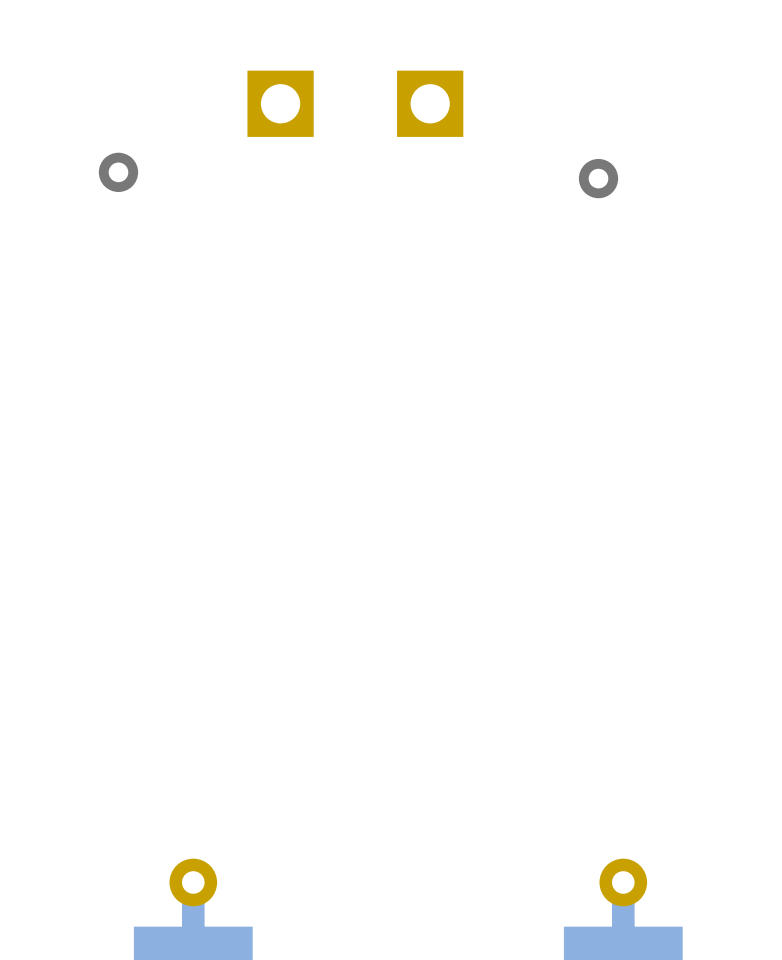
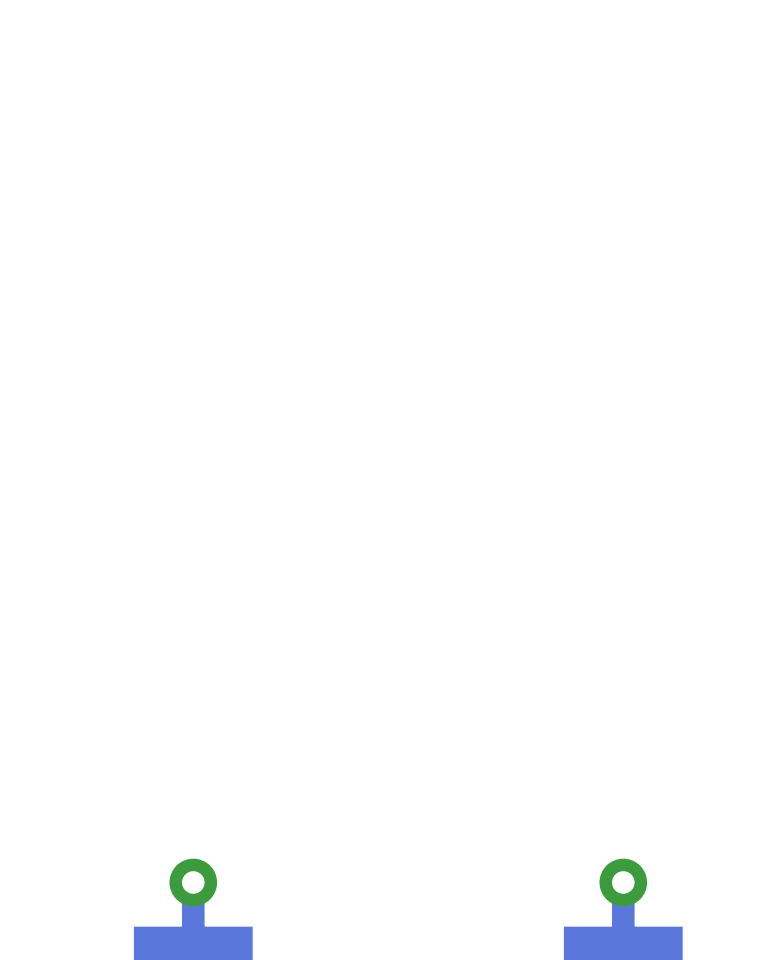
part: (280, 103) -> none
part: (430, 103) -> none
via: (118, 172) -> none
via: (598, 178) -> none

